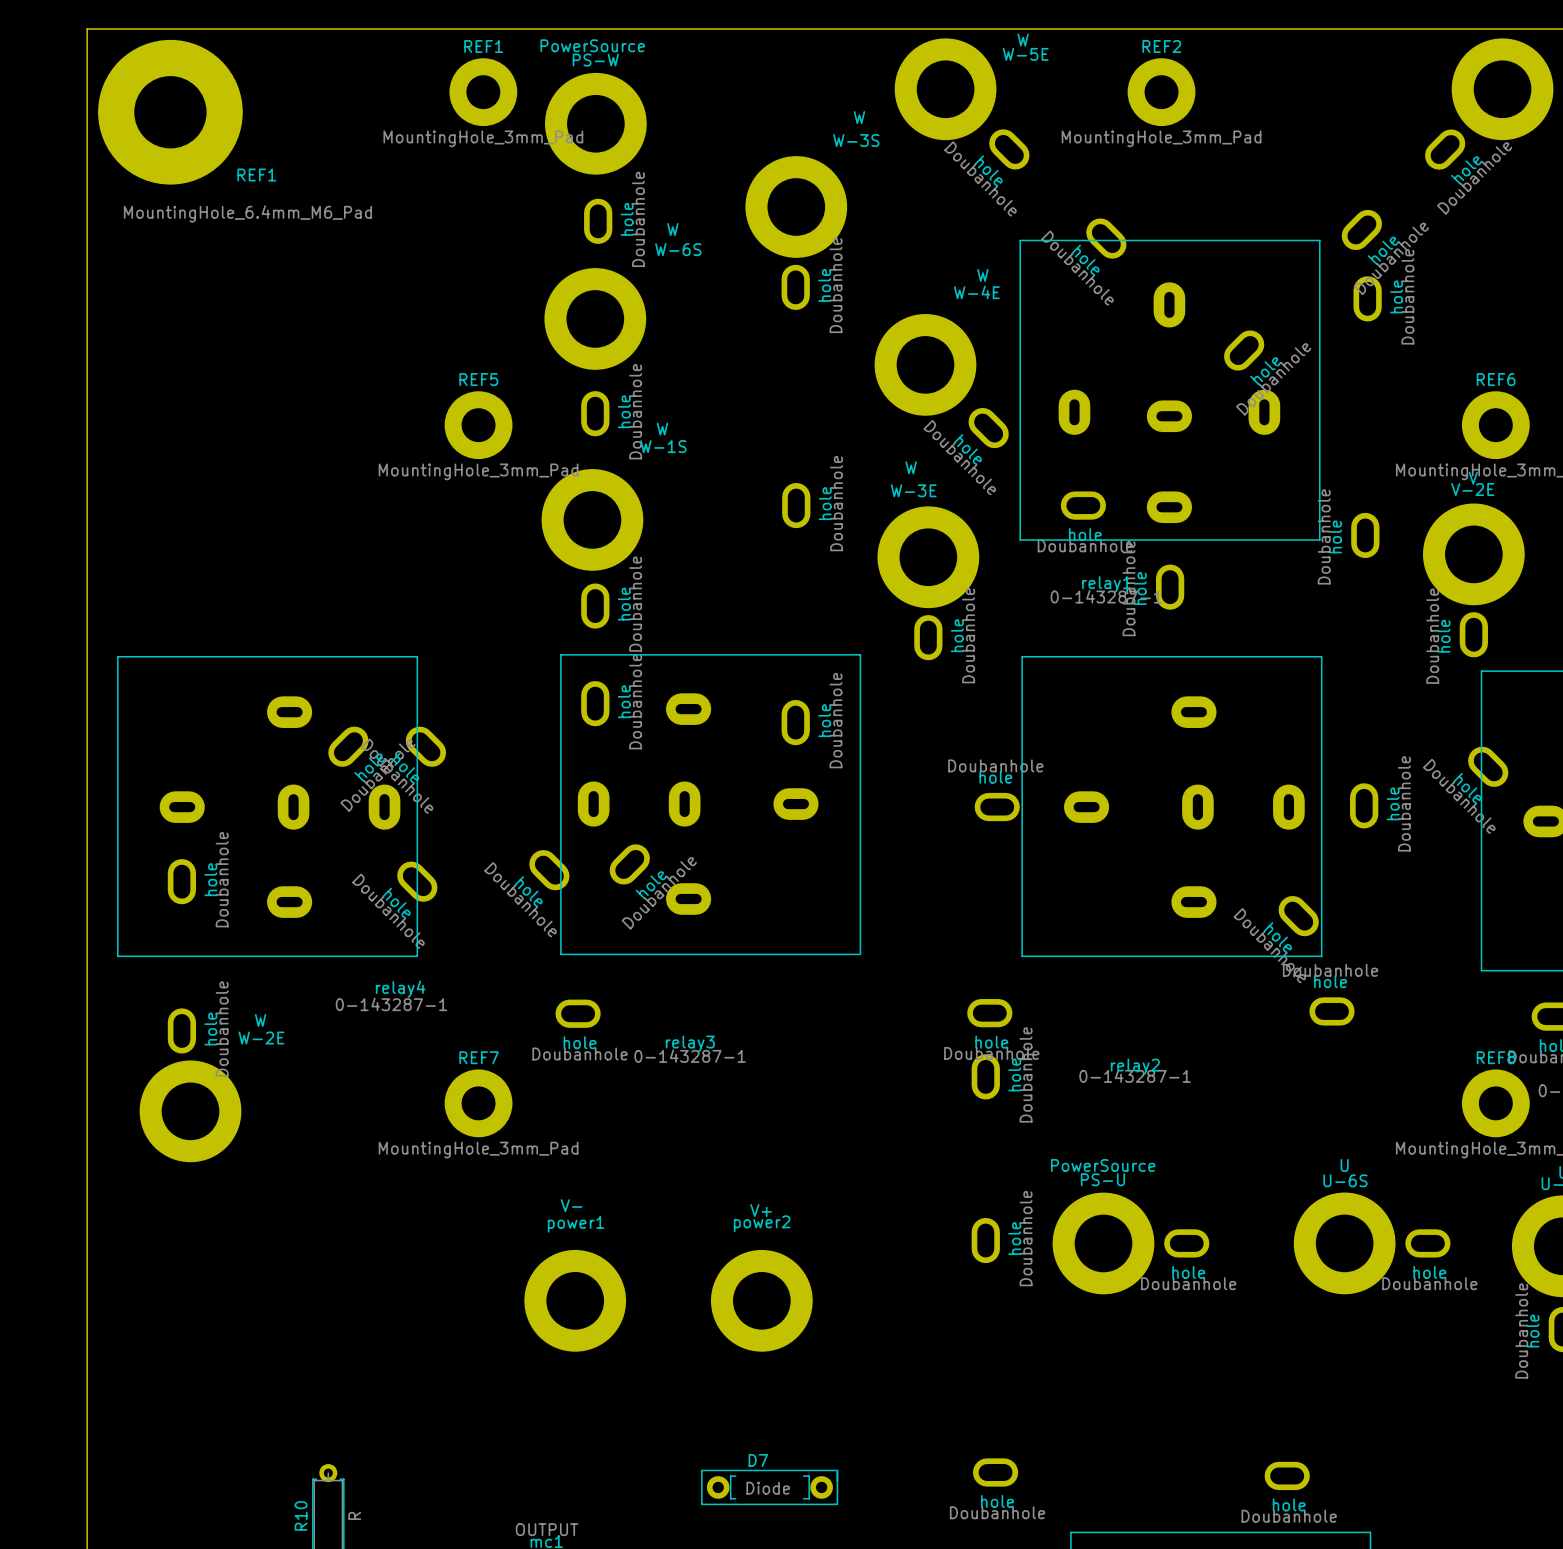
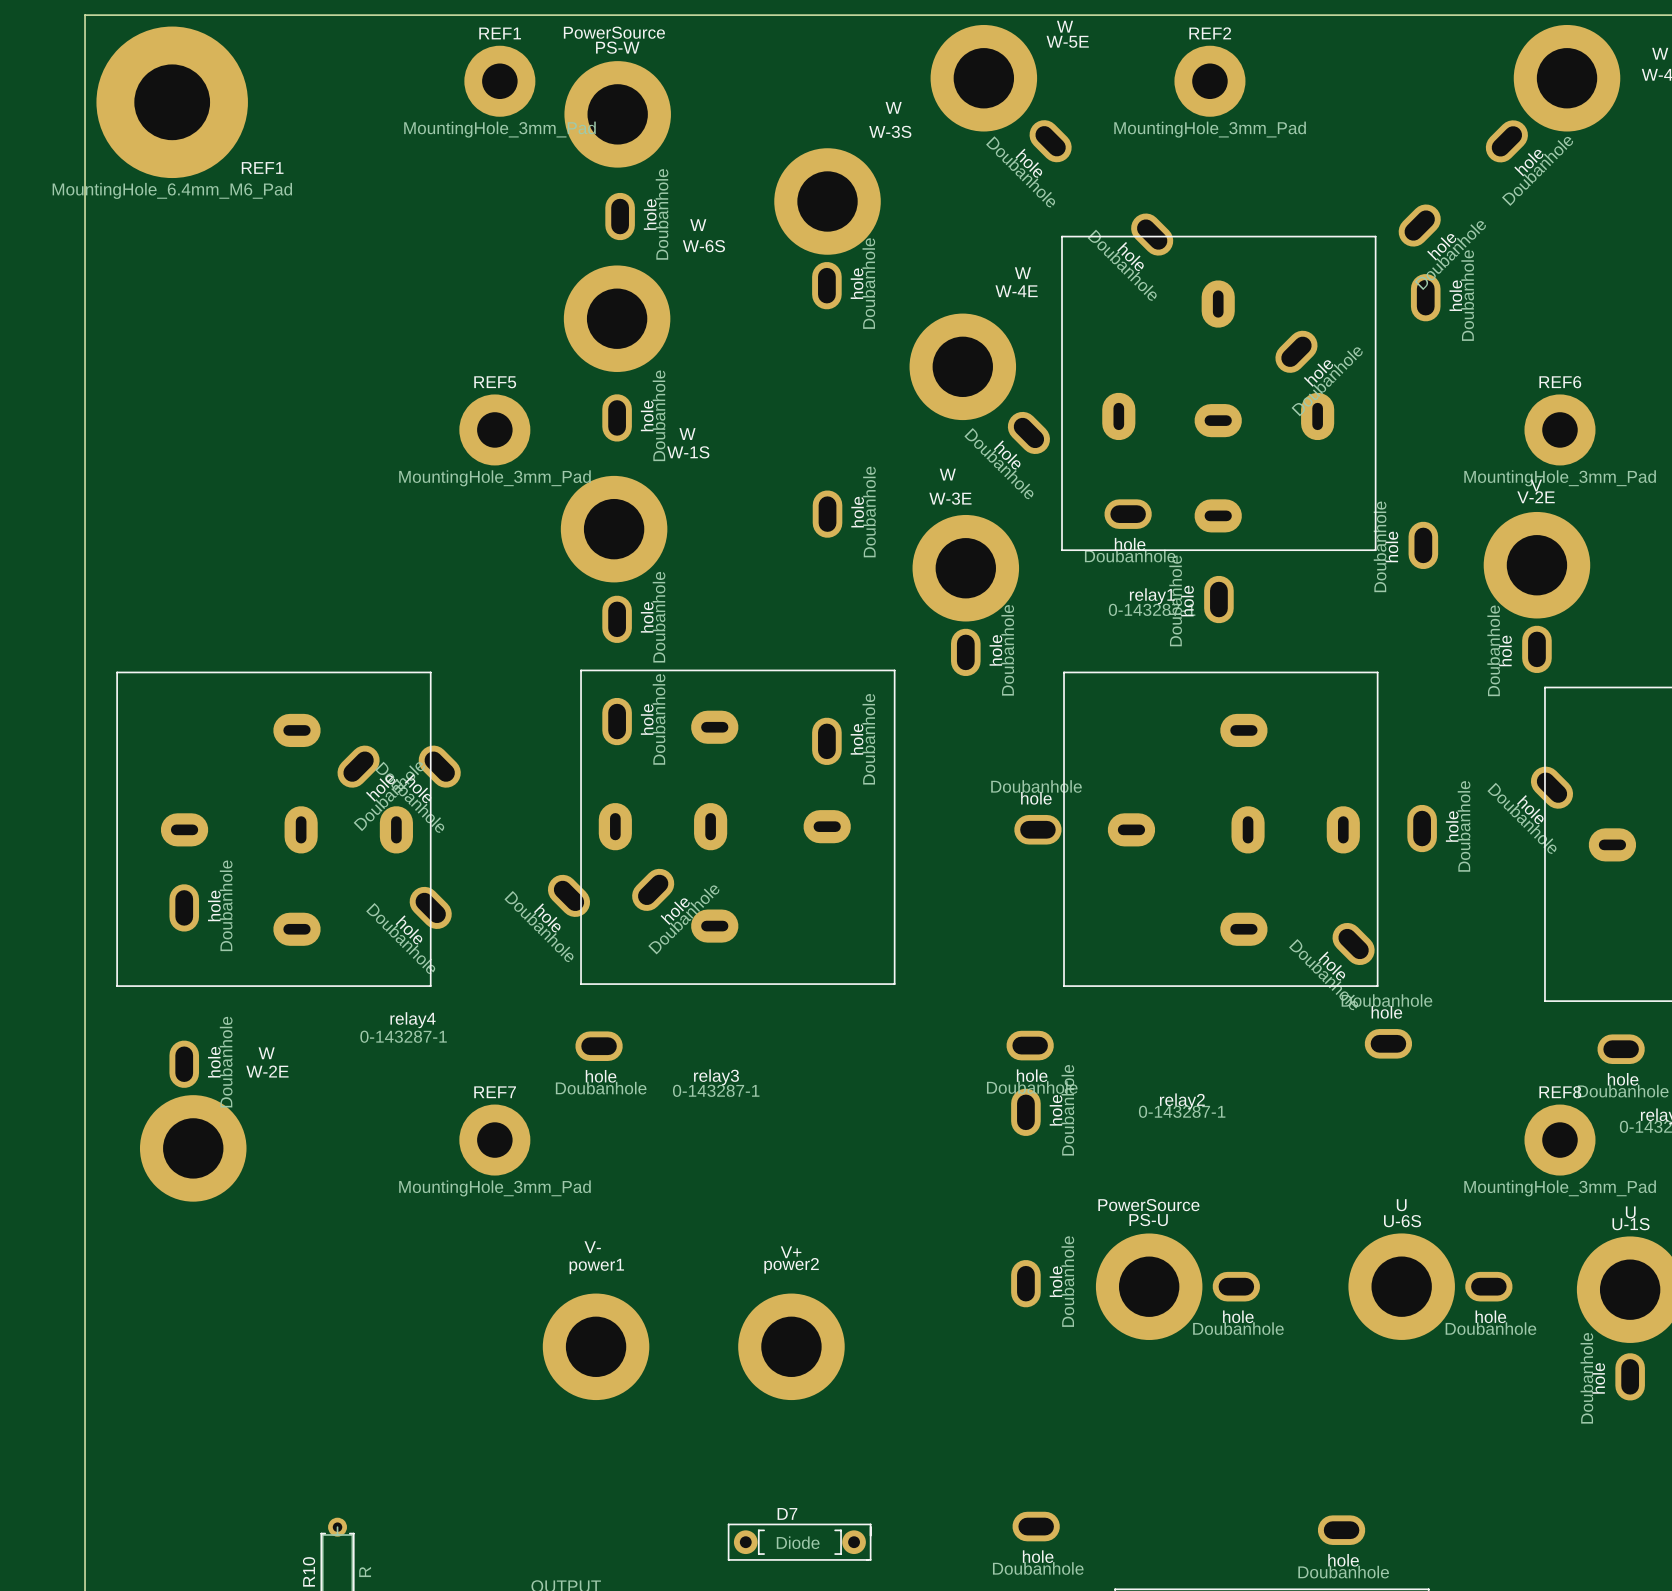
REF1 value position: MountingHole_6.4mm_M6_Pad (247, 213) -> MountingHole_6.4mm_M6_Pad (172, 190)

